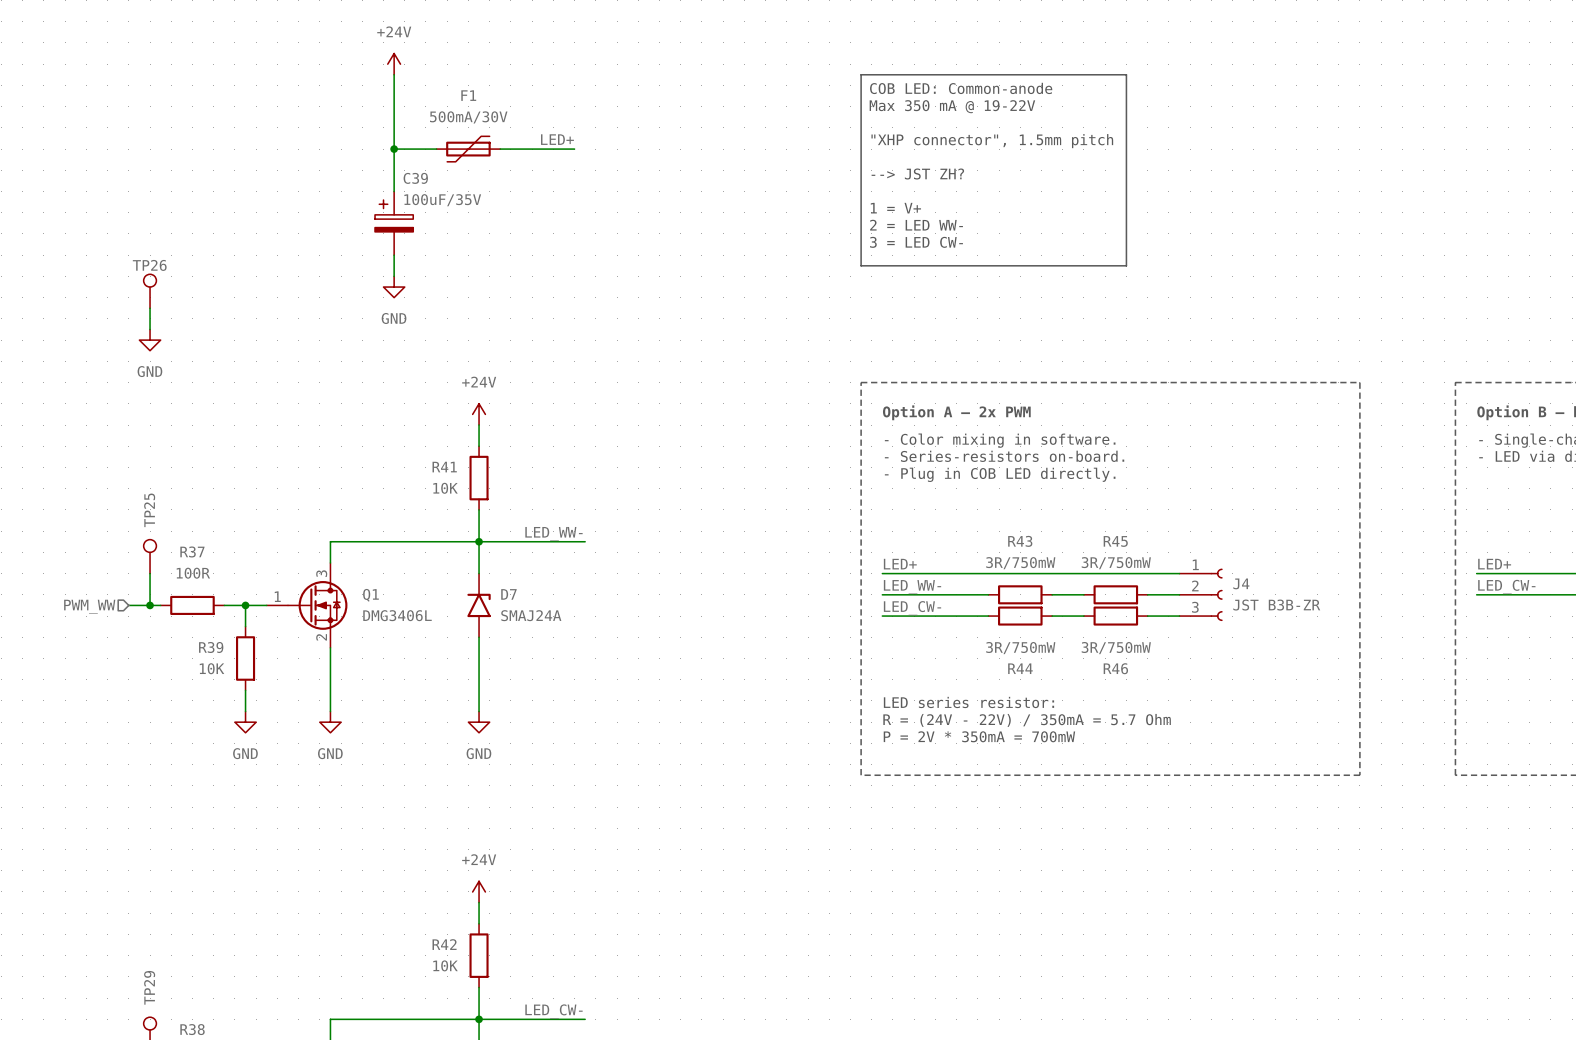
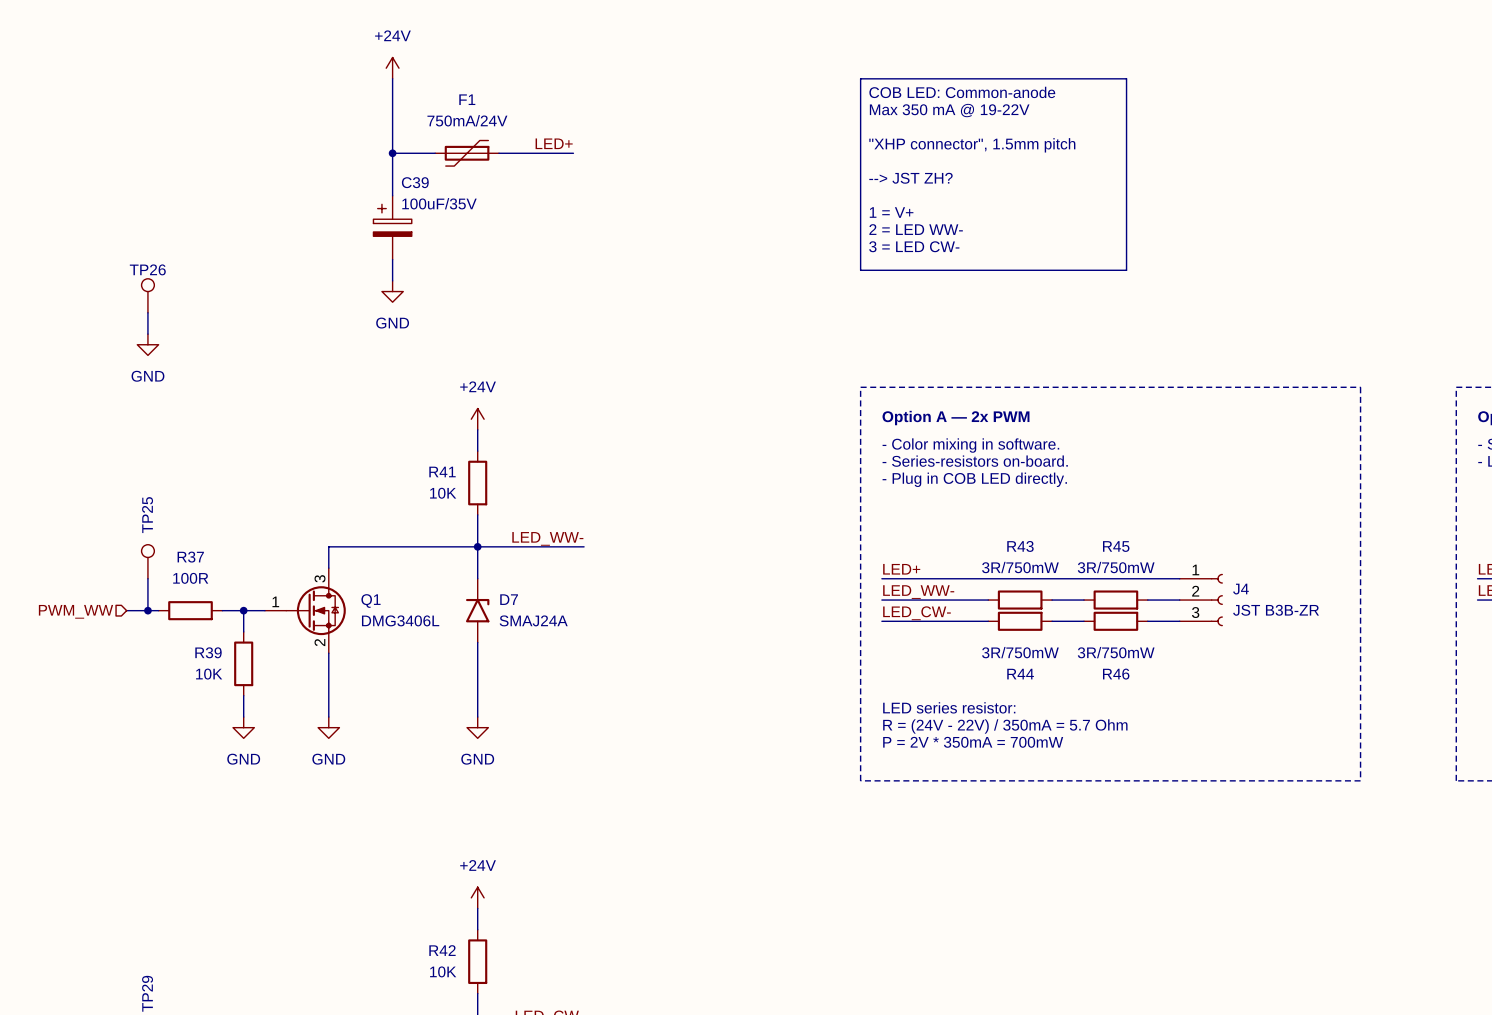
F1 value: 500mA/30V (468, 117) -> 750mA/24V (467, 120)

